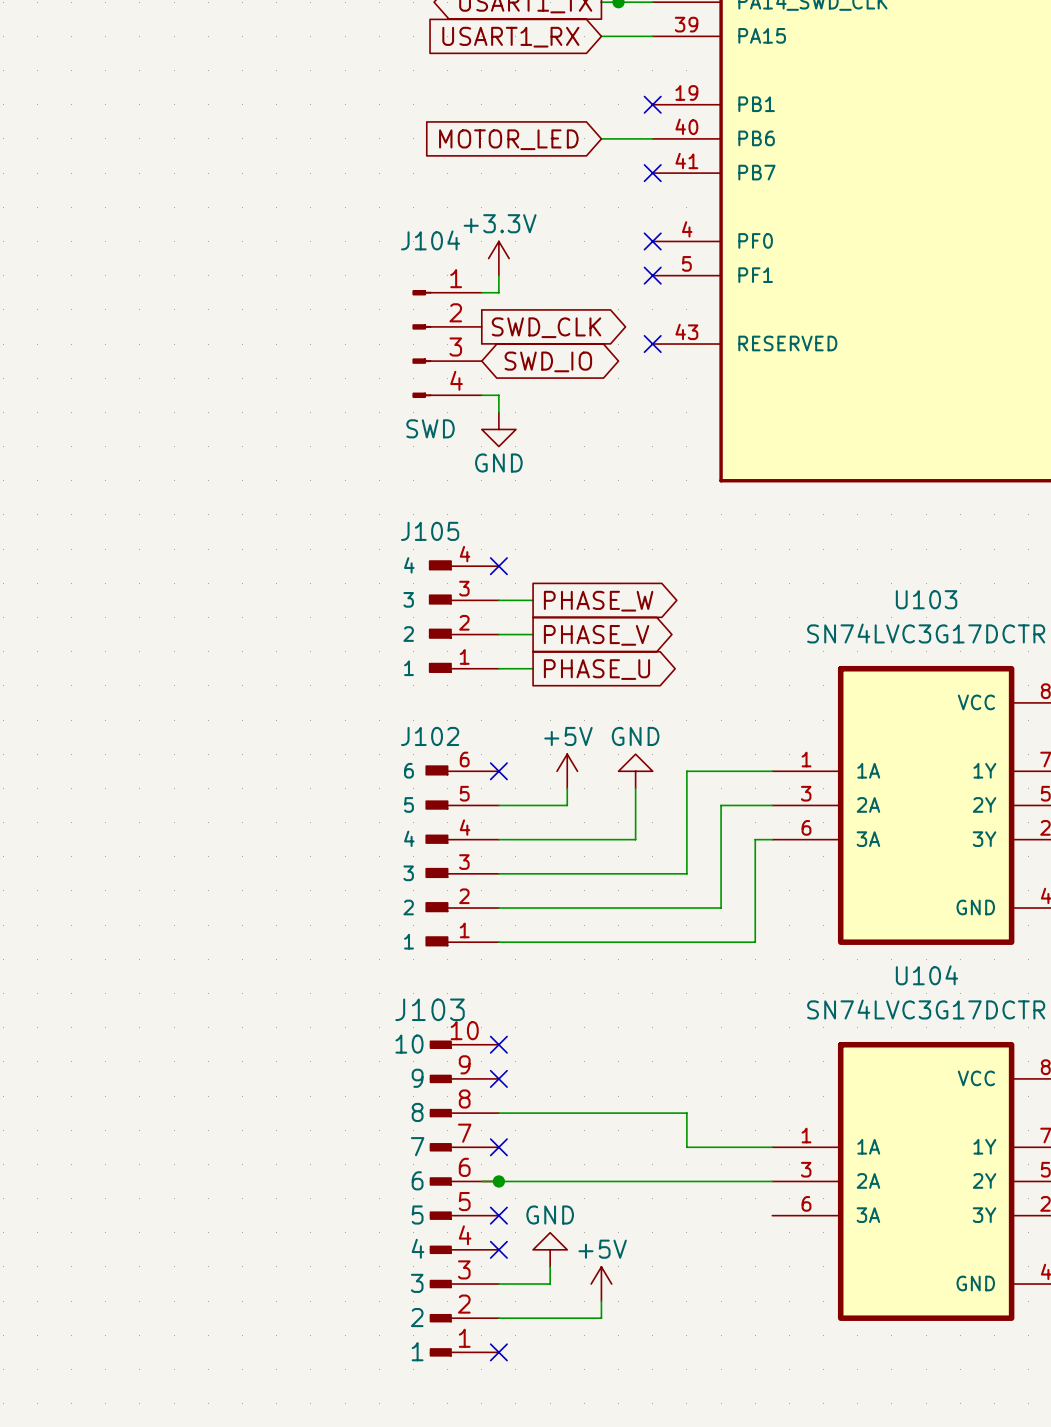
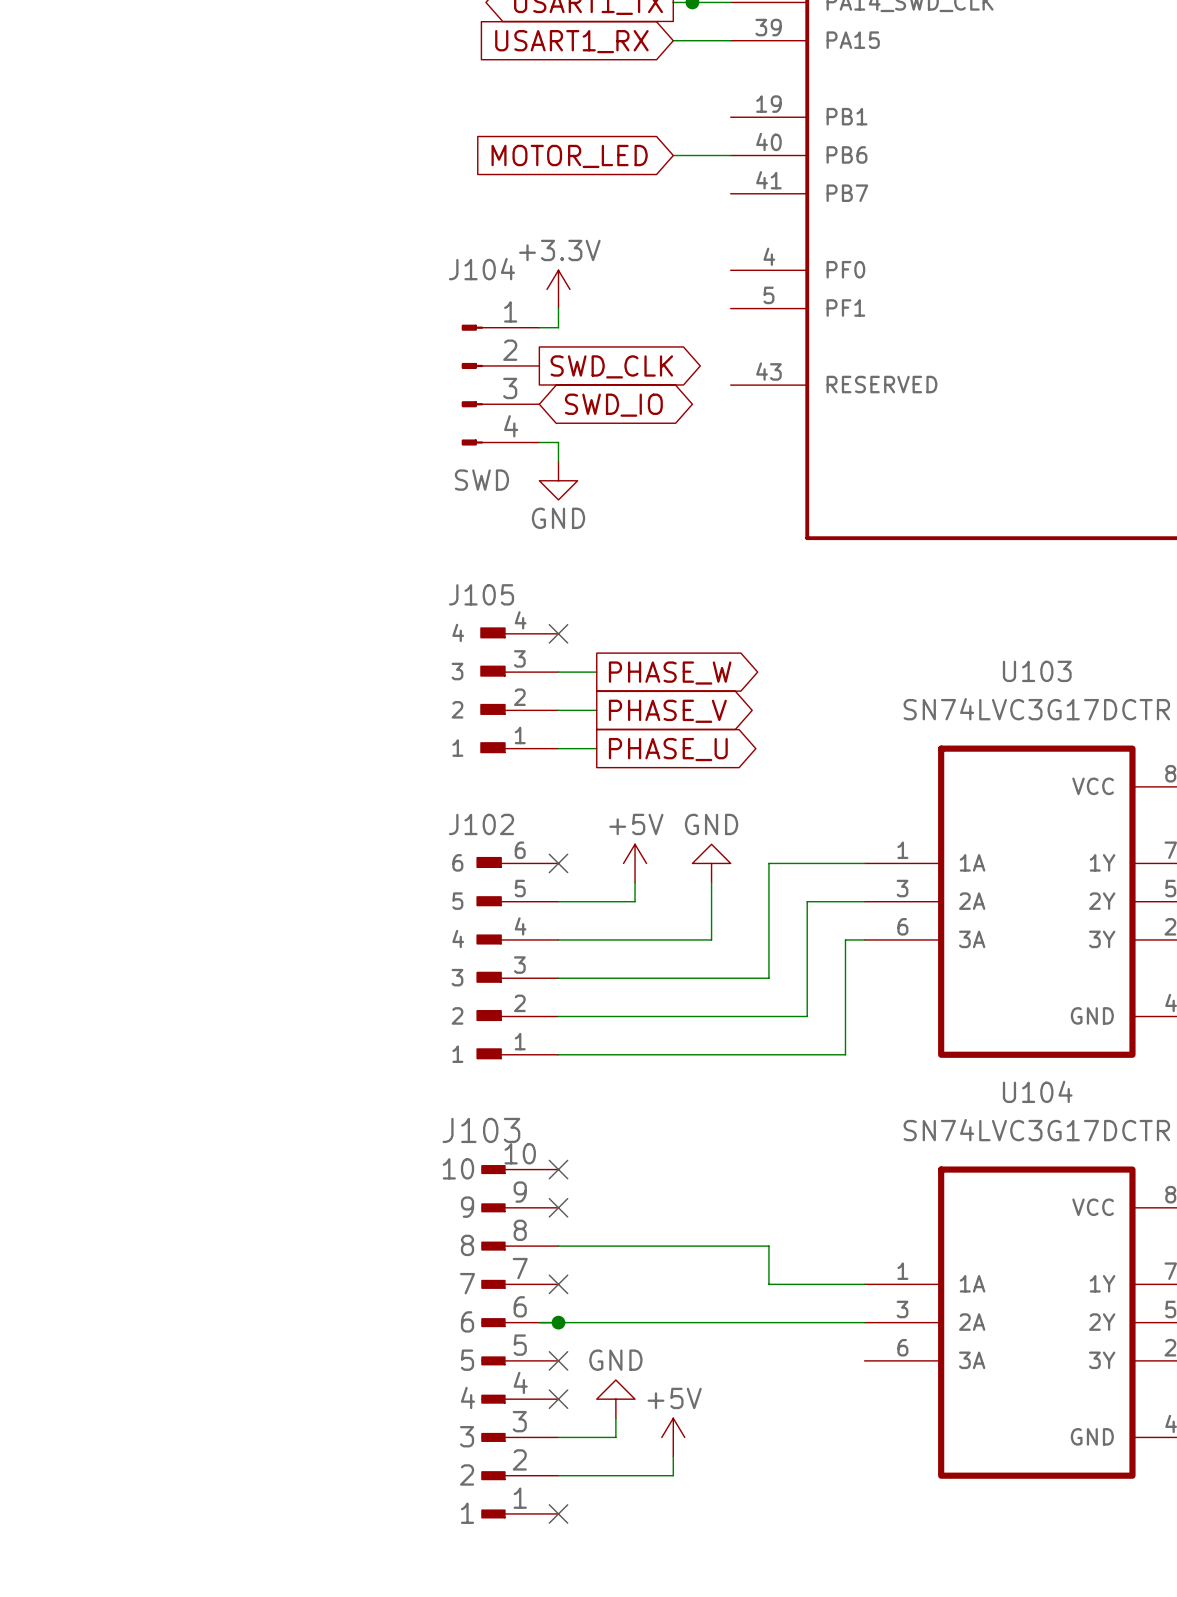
no-connect mark: (652, 104) -> none
no-connect mark: (652, 173) -> none
no-connect mark: (652, 241) -> none
no-connect mark: (652, 275) -> none
no-connect mark: (652, 344) -> none

